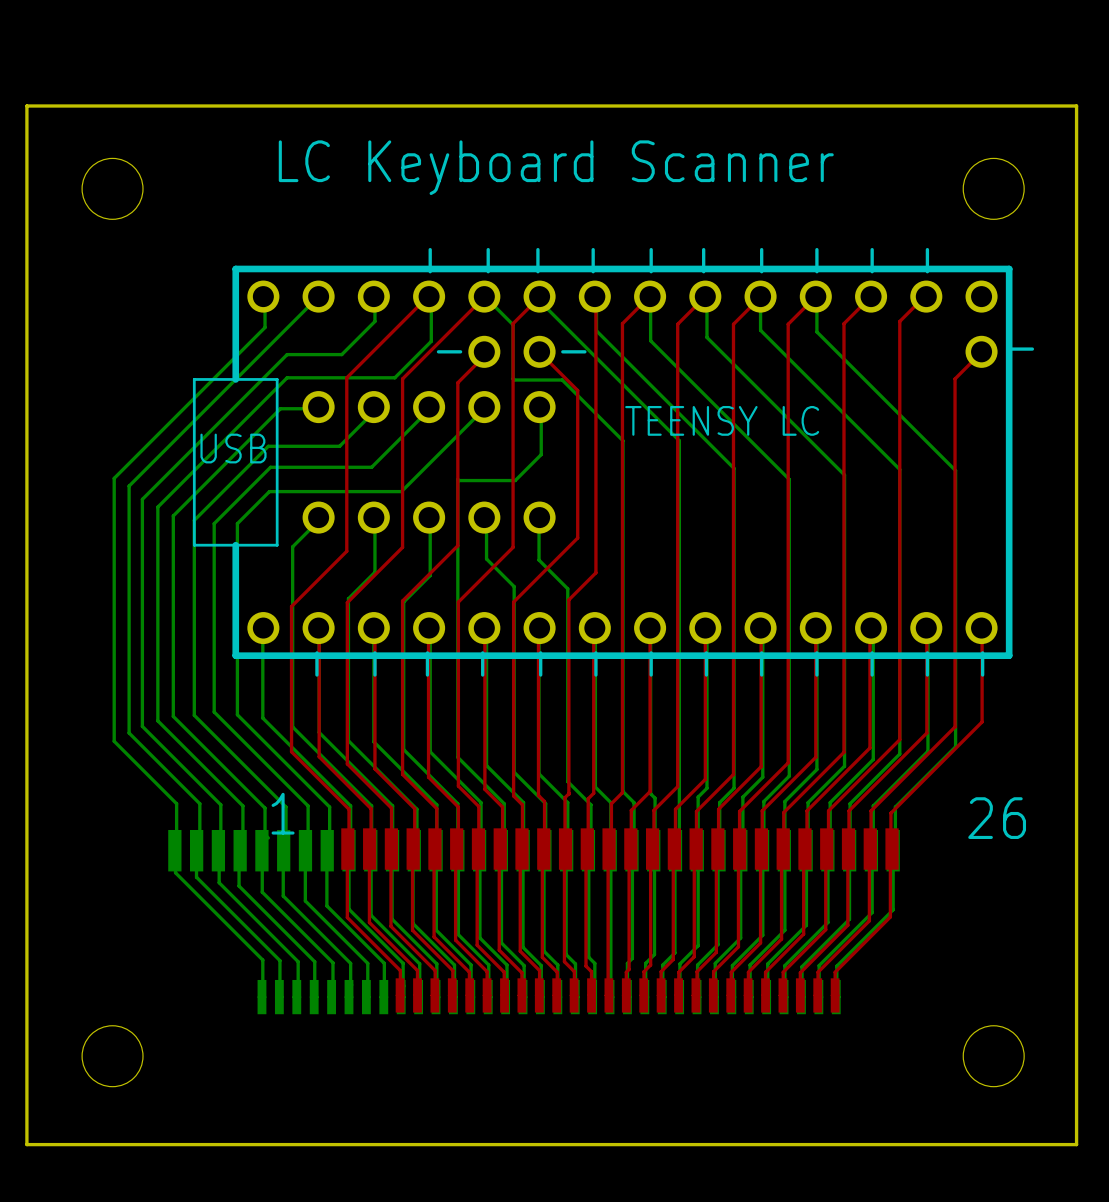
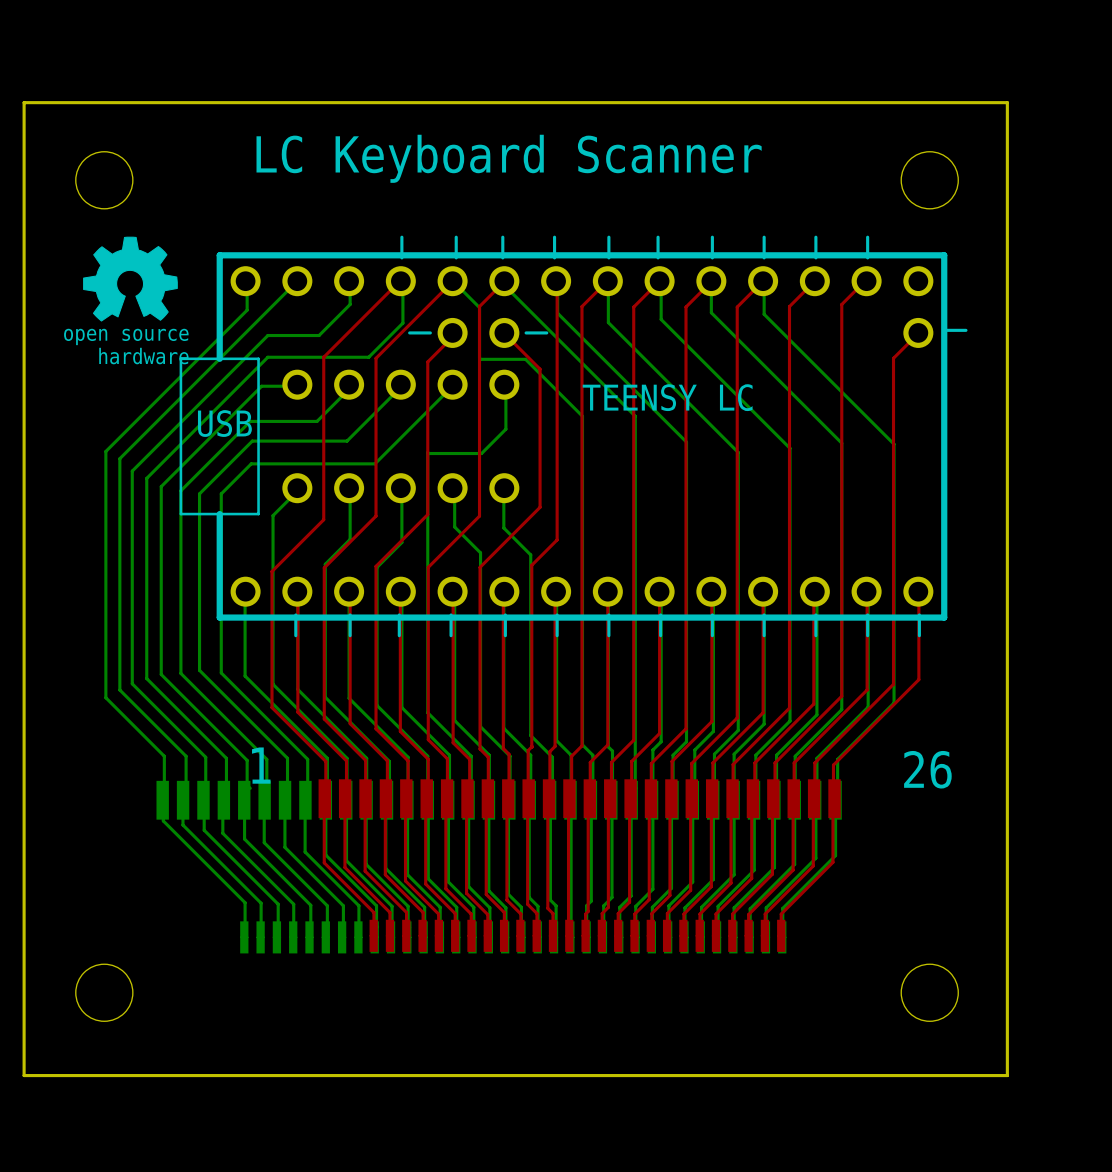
drawing: none -> [83, 236, 178, 322]

